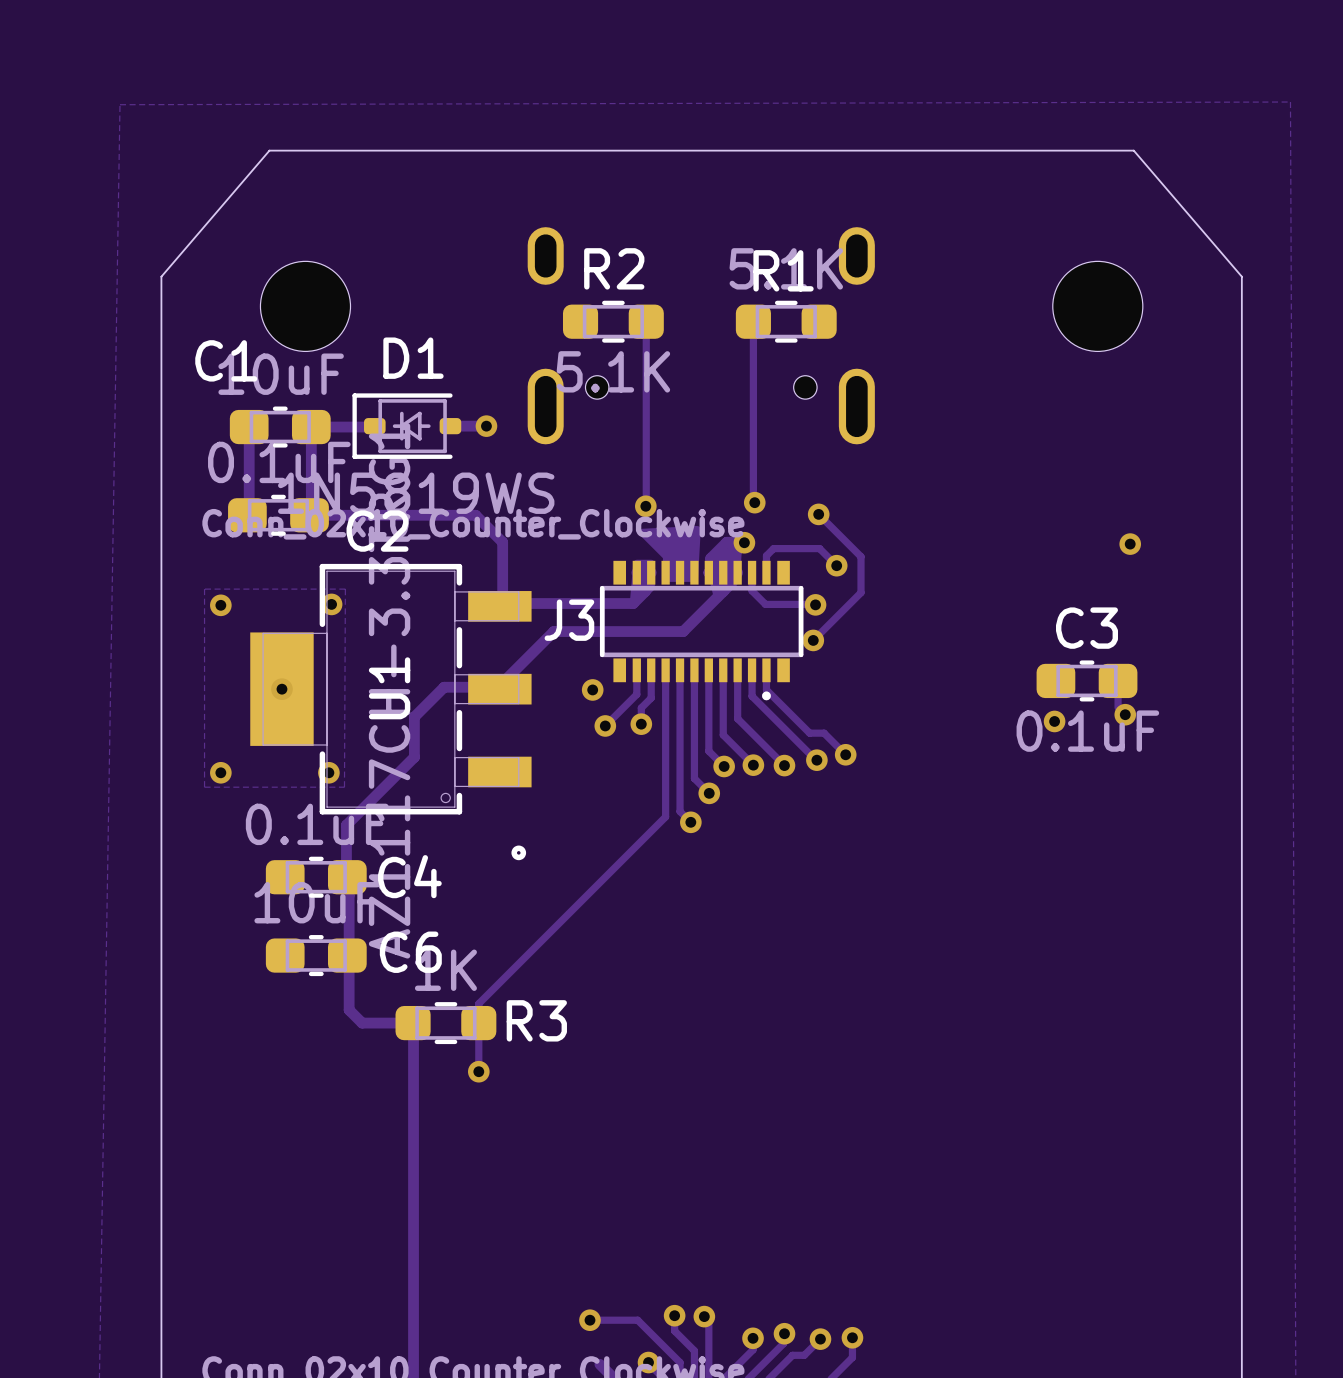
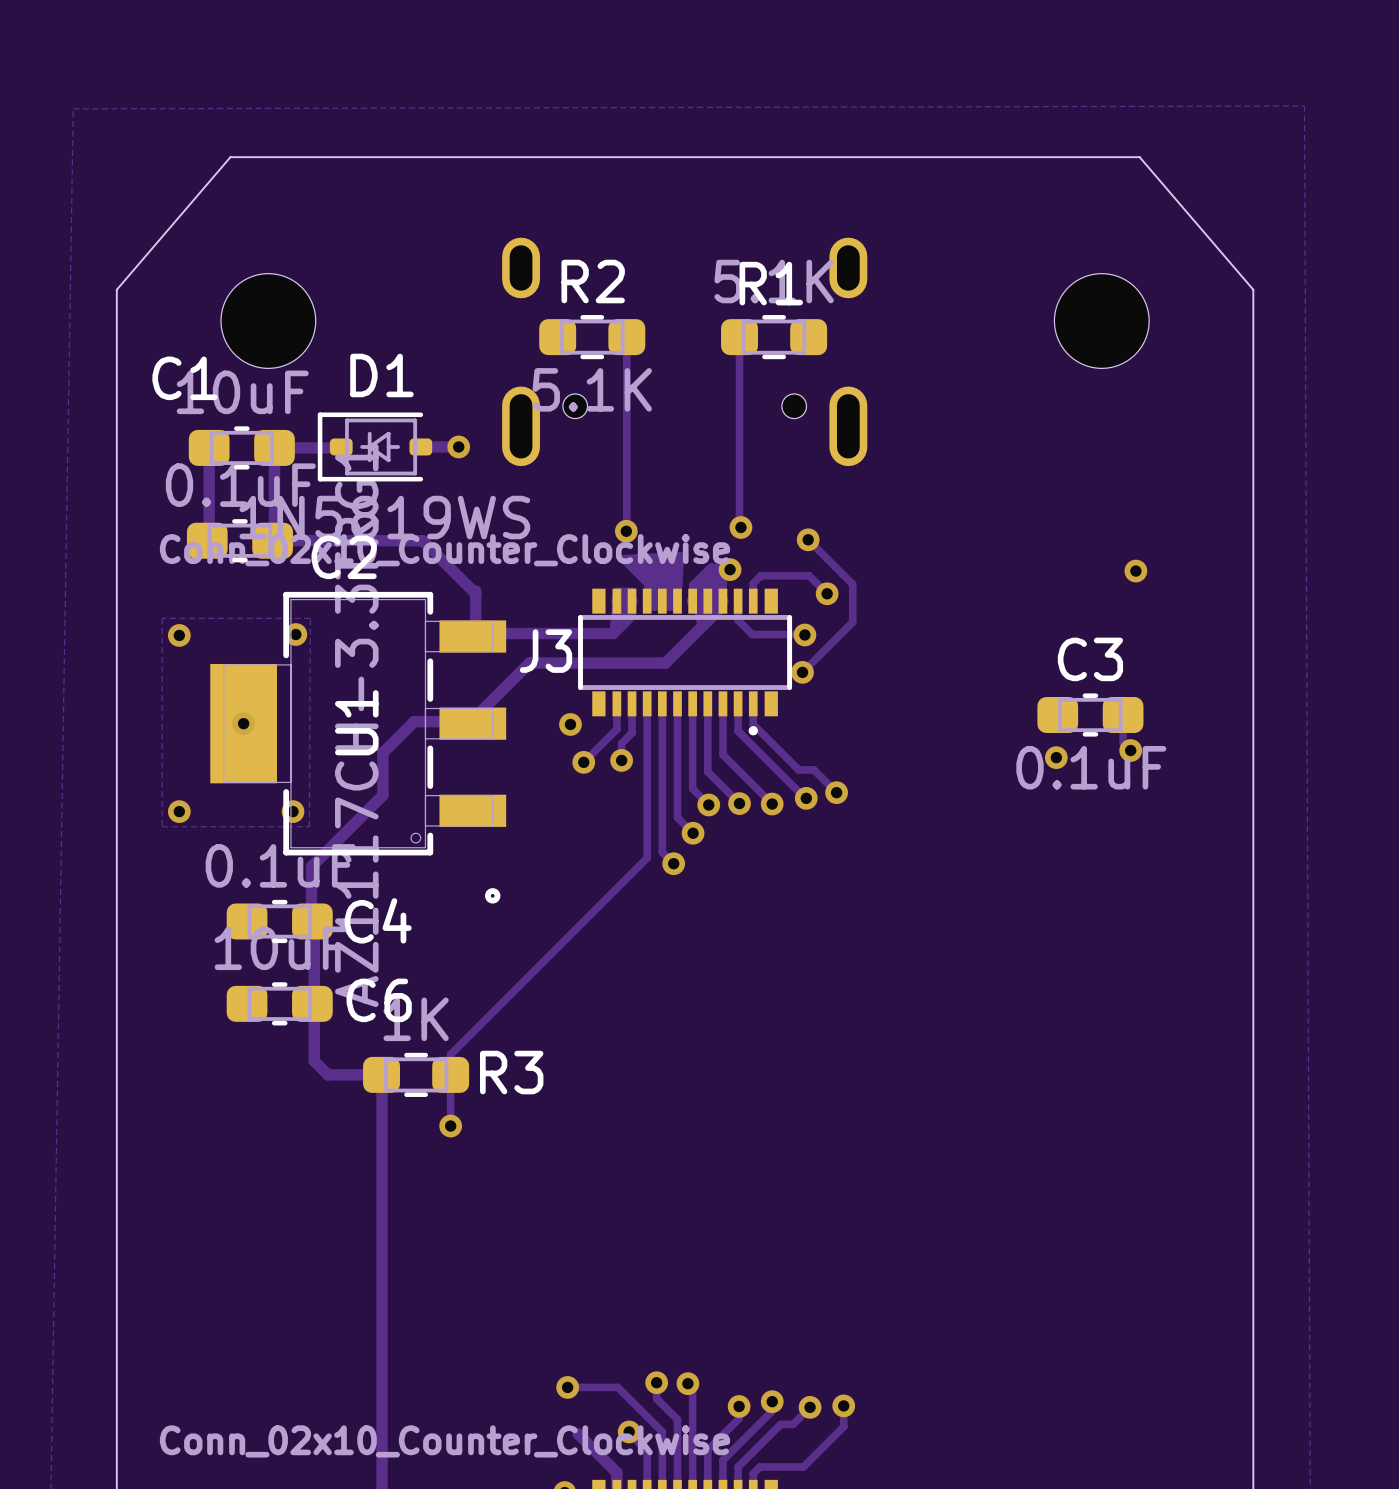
track: (452, 515) (475, 515) (502, 542) (502, 563) -> (422, 540) (475, 593)

